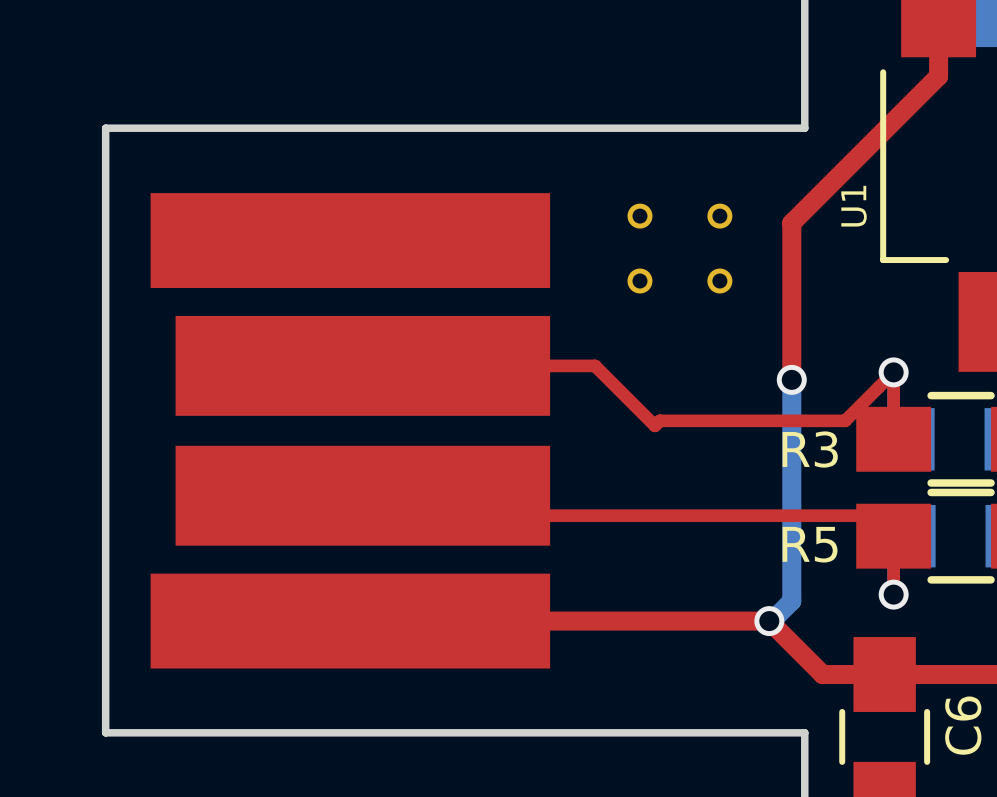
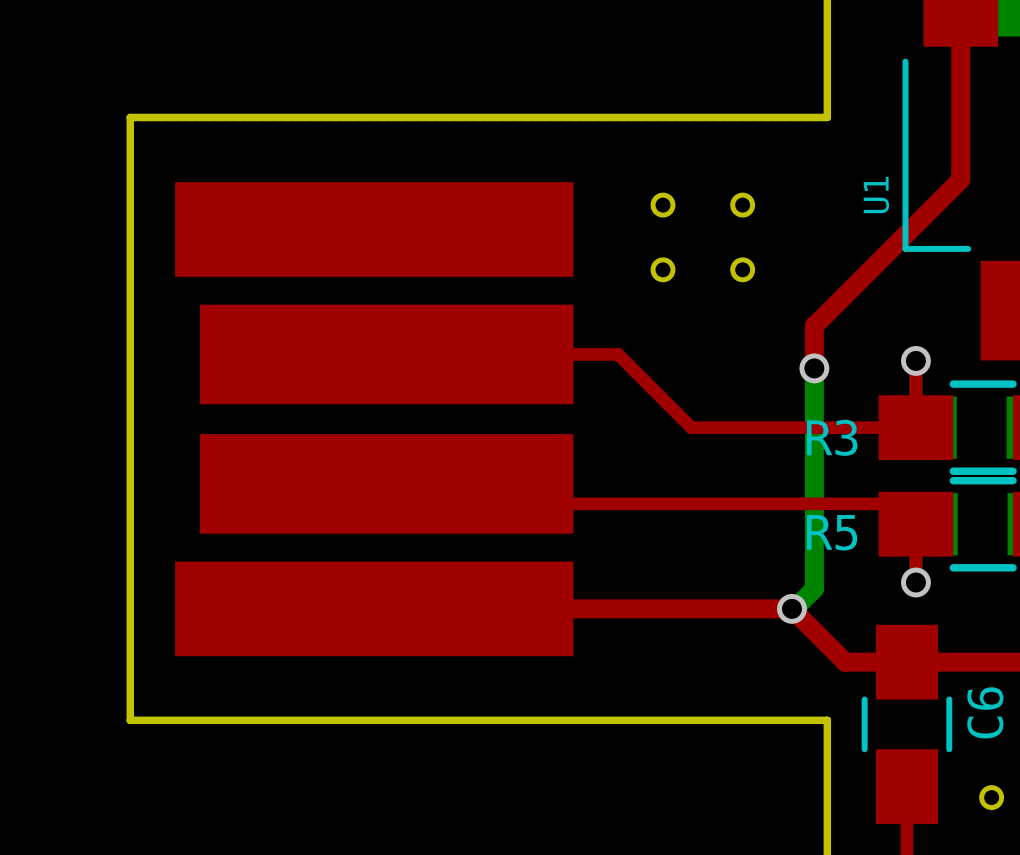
top track: (938, 76) (791, 223) (791, 337) -> (960, 65) (960, 179) (814, 326)
top track: (893, 372) (845, 420) (659, 420) (654, 425) -> (915, 427) (691, 427) (677, 414)

